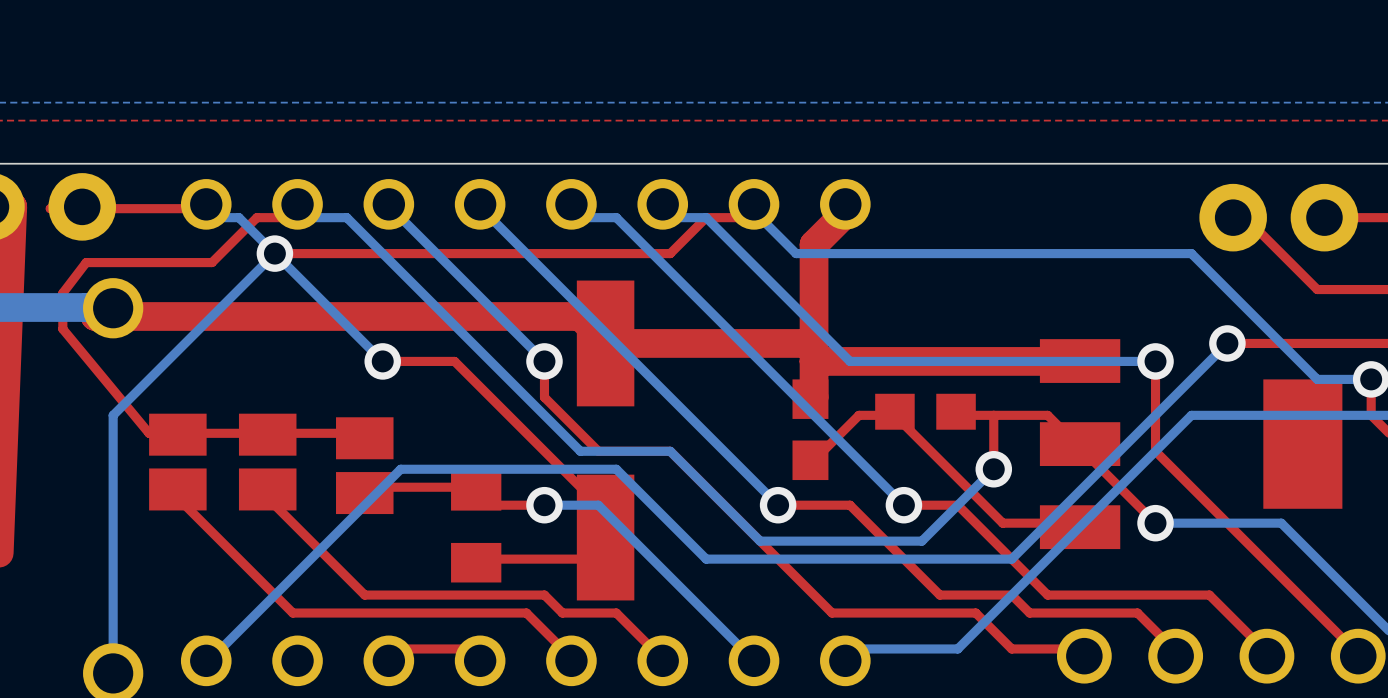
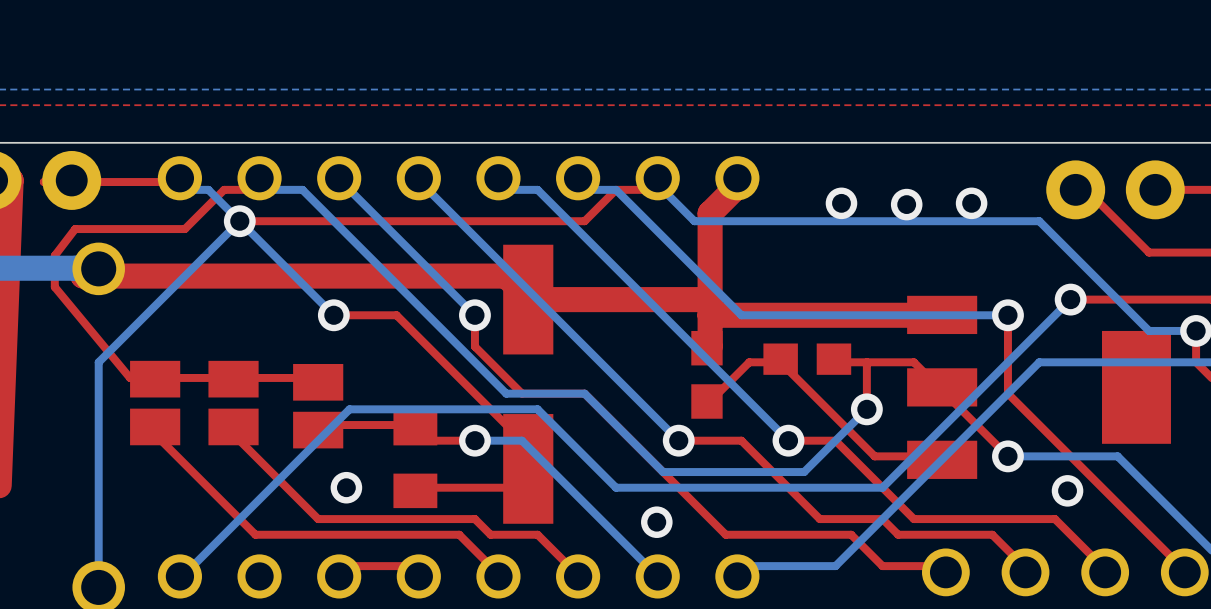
via: none -> (841, 203)
via: none -> (971, 203)
via: none -> (906, 204)
via: none -> (346, 487)
via: none -> (1067, 490)
via: none -> (656, 522)

